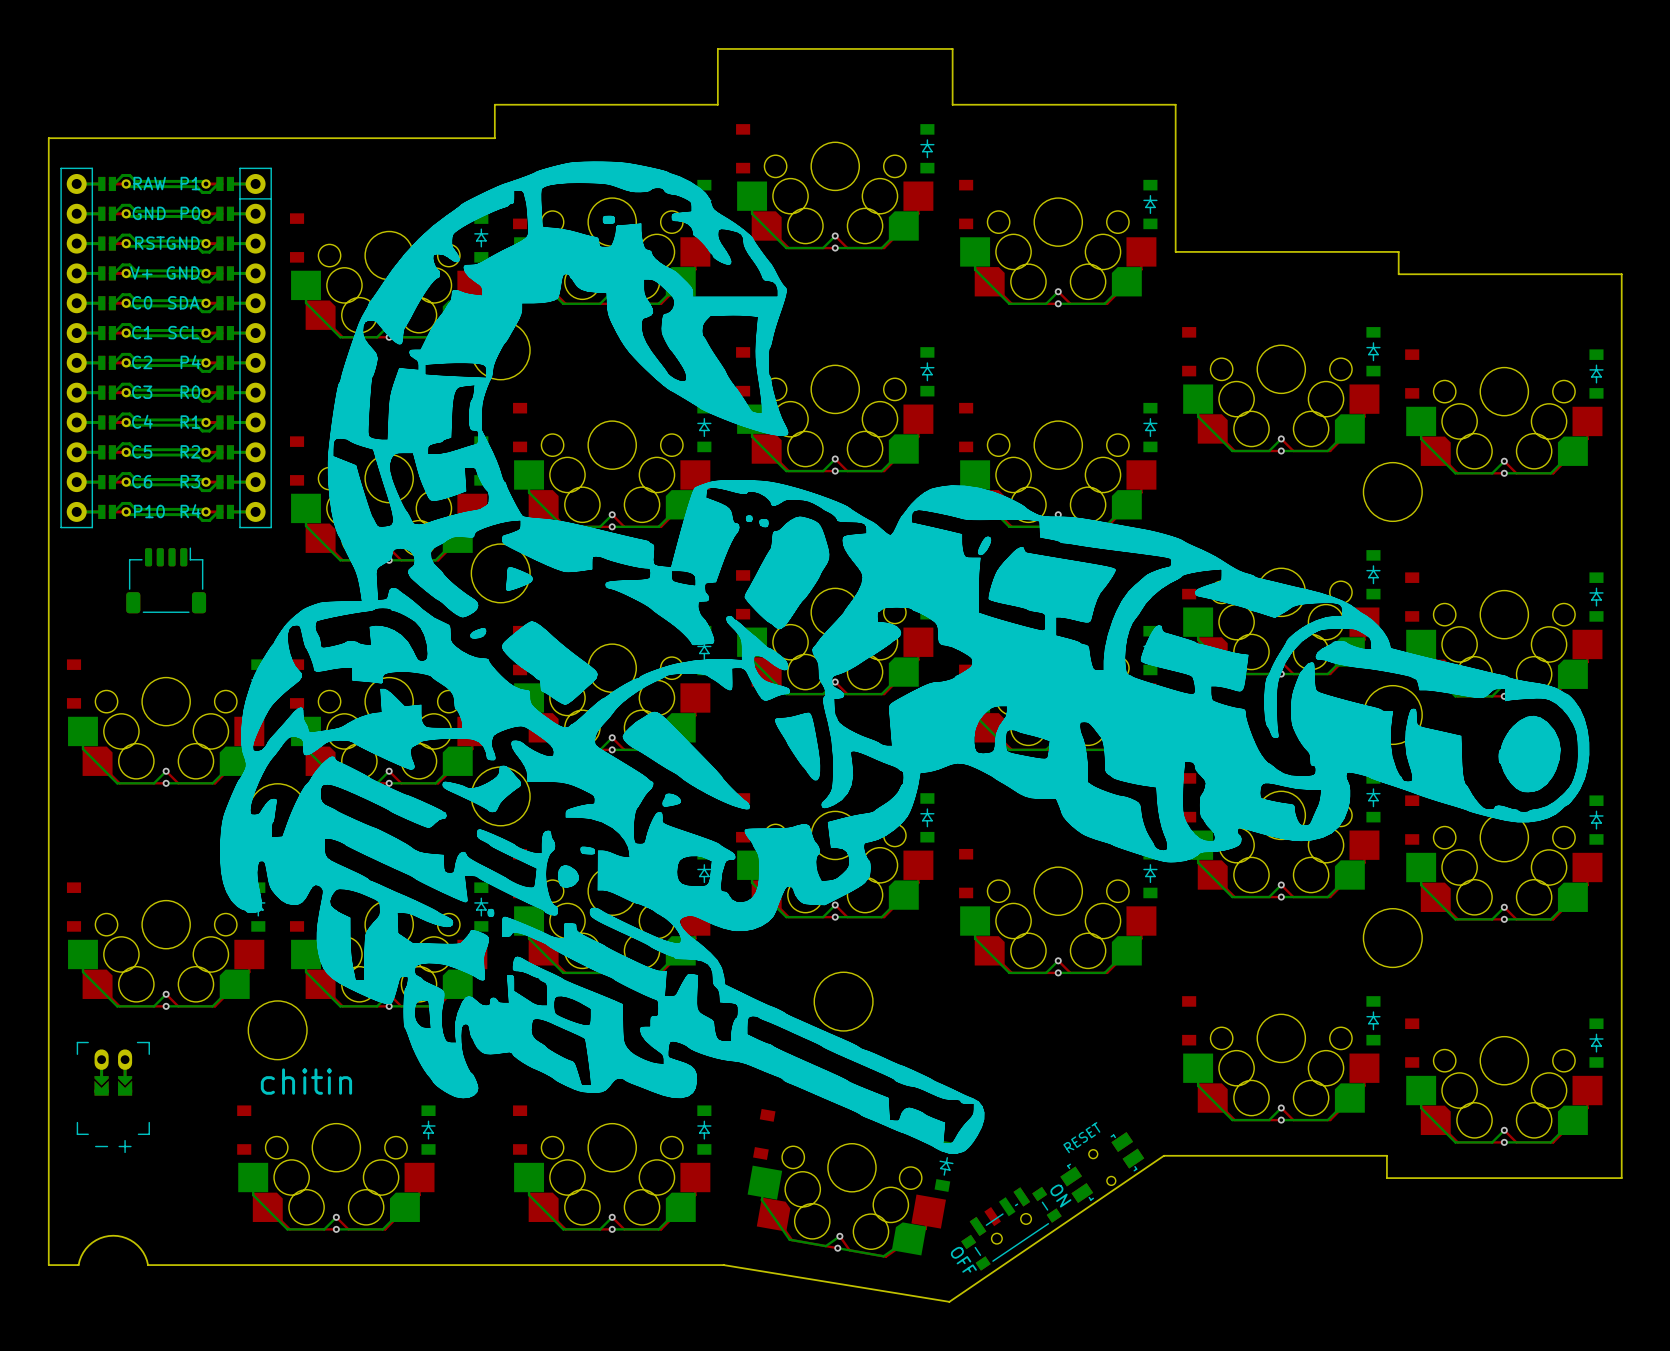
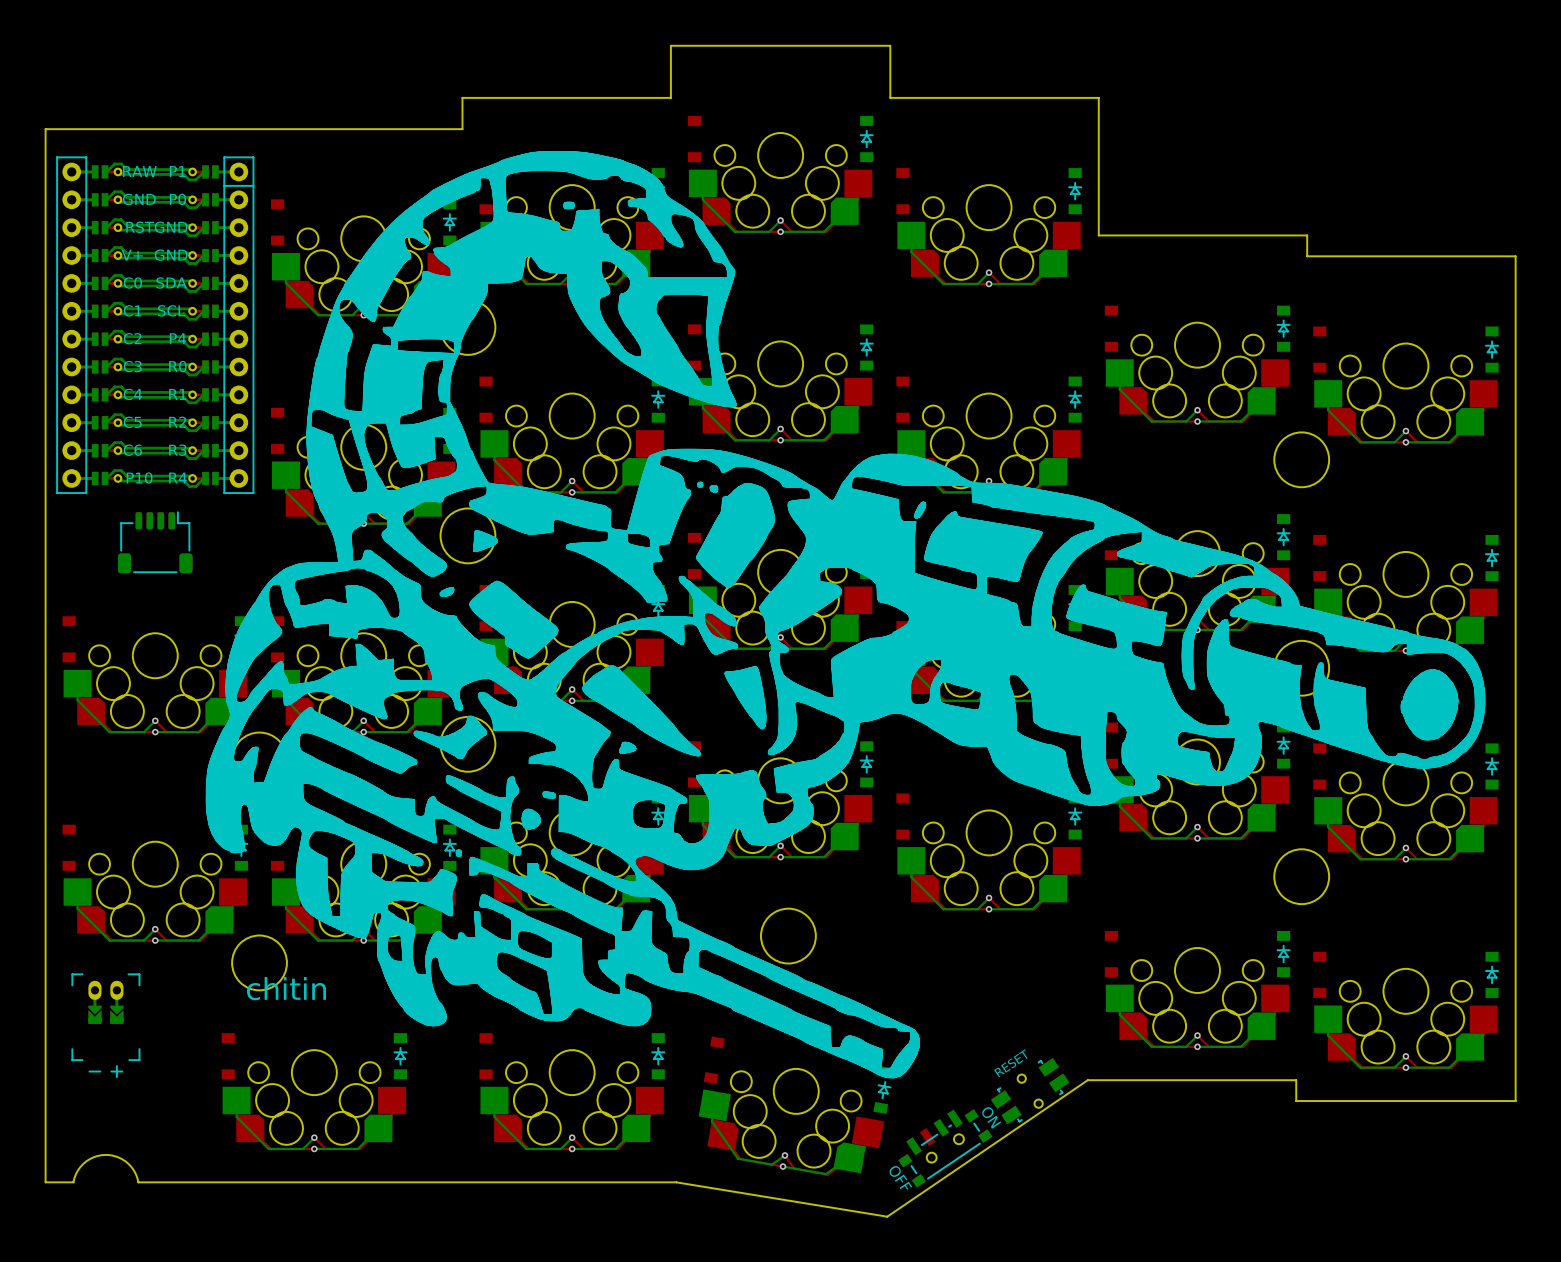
drawing shape: [220, 161, 1590, 1154] -> [205, 150, 1486, 1079]

